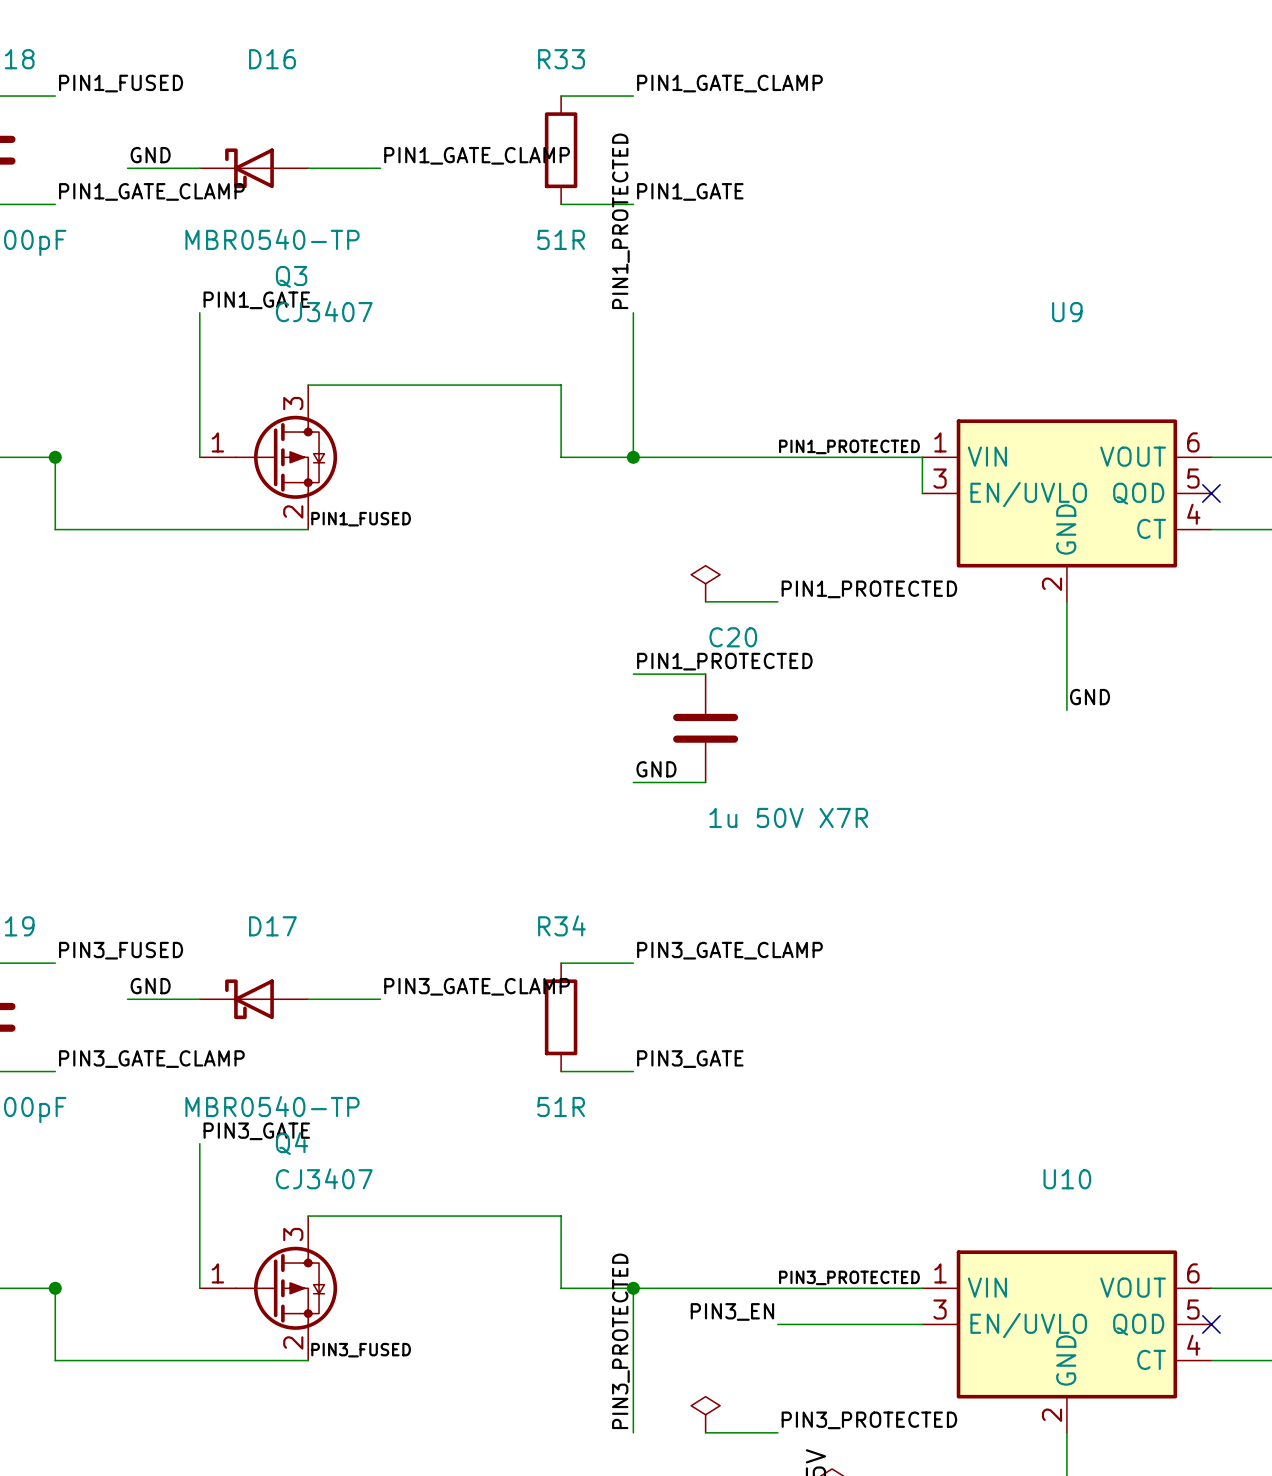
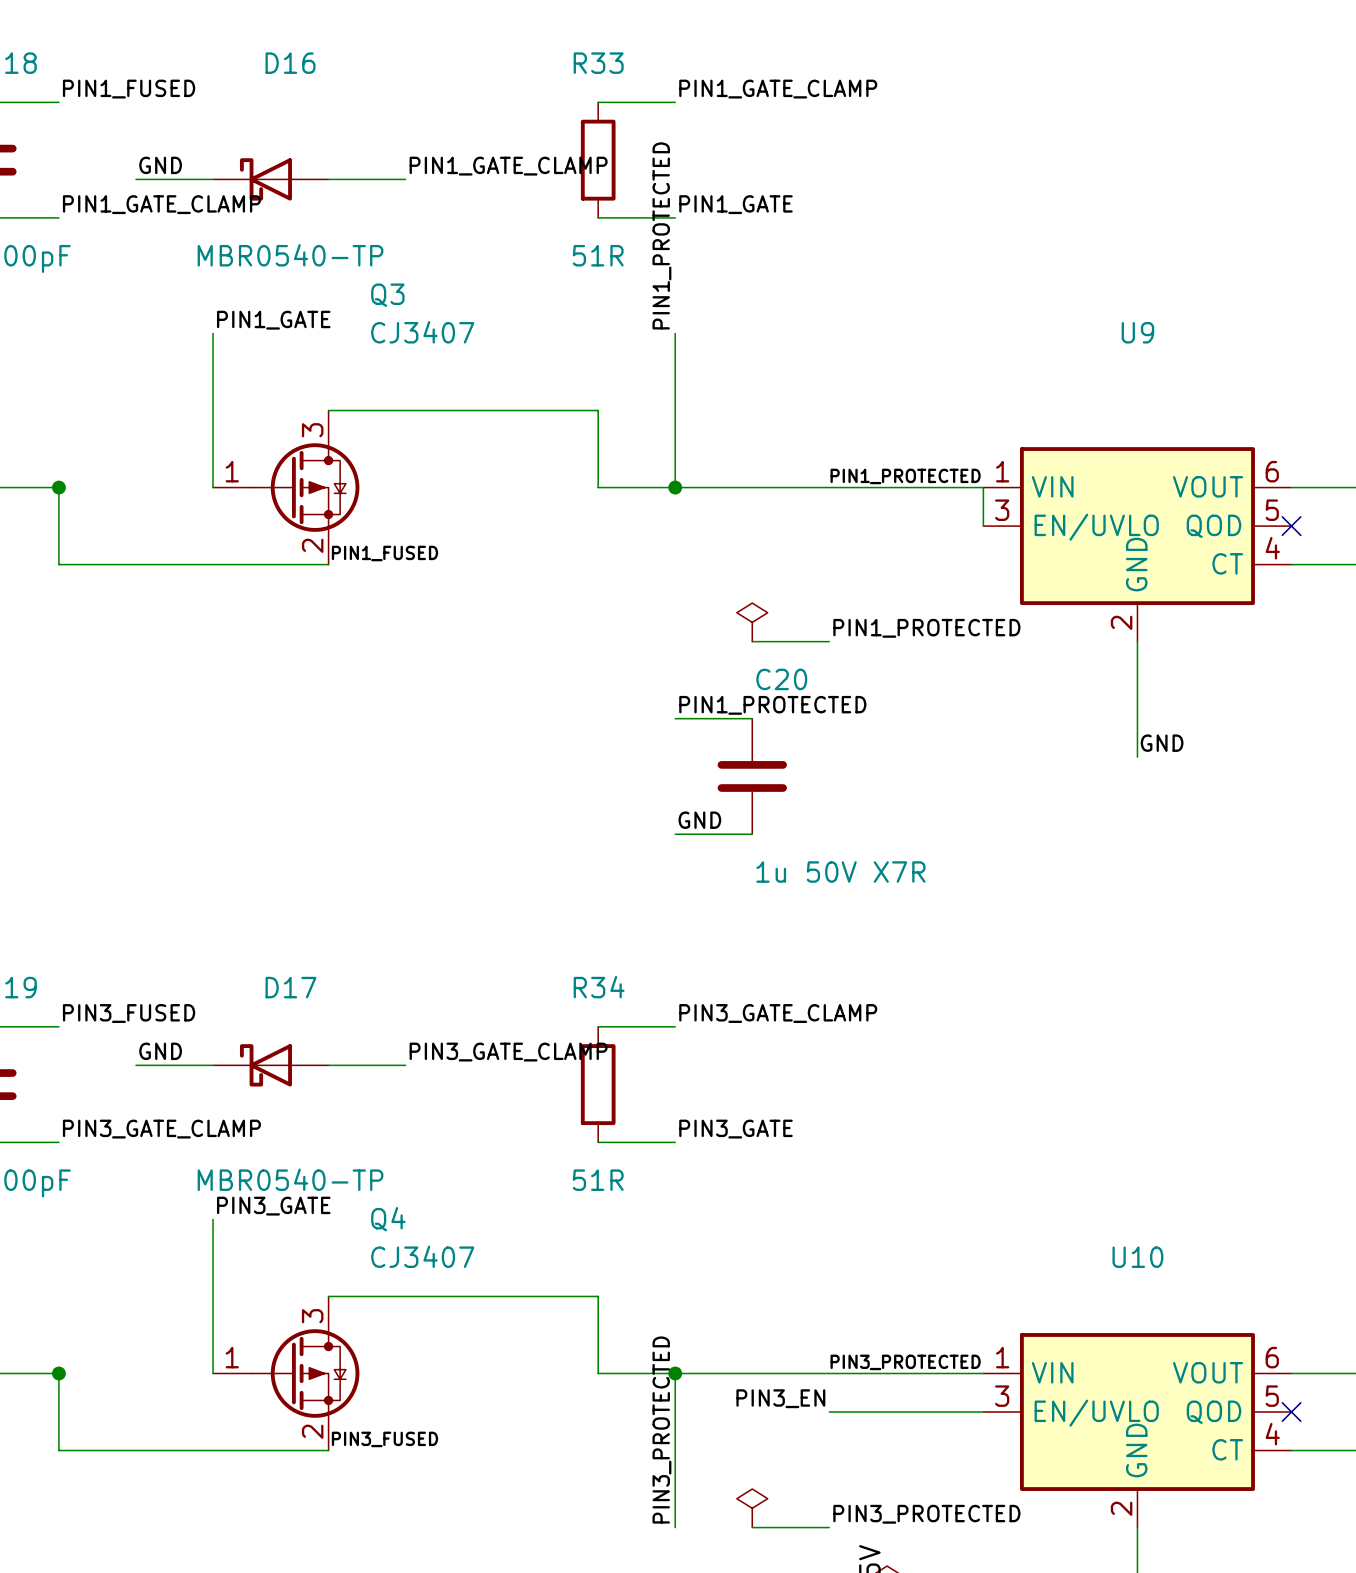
Q3 name position: Q3 (291, 276) -> Q3 (387, 295)
Q3 value position: CJ3407 (324, 311) -> CJ3407 (422, 332)
Q4 name position: Q4 (291, 1143) -> Q4 (388, 1219)
Q4 value position: CJ3407 (324, 1178) -> CJ3407 (422, 1256)

